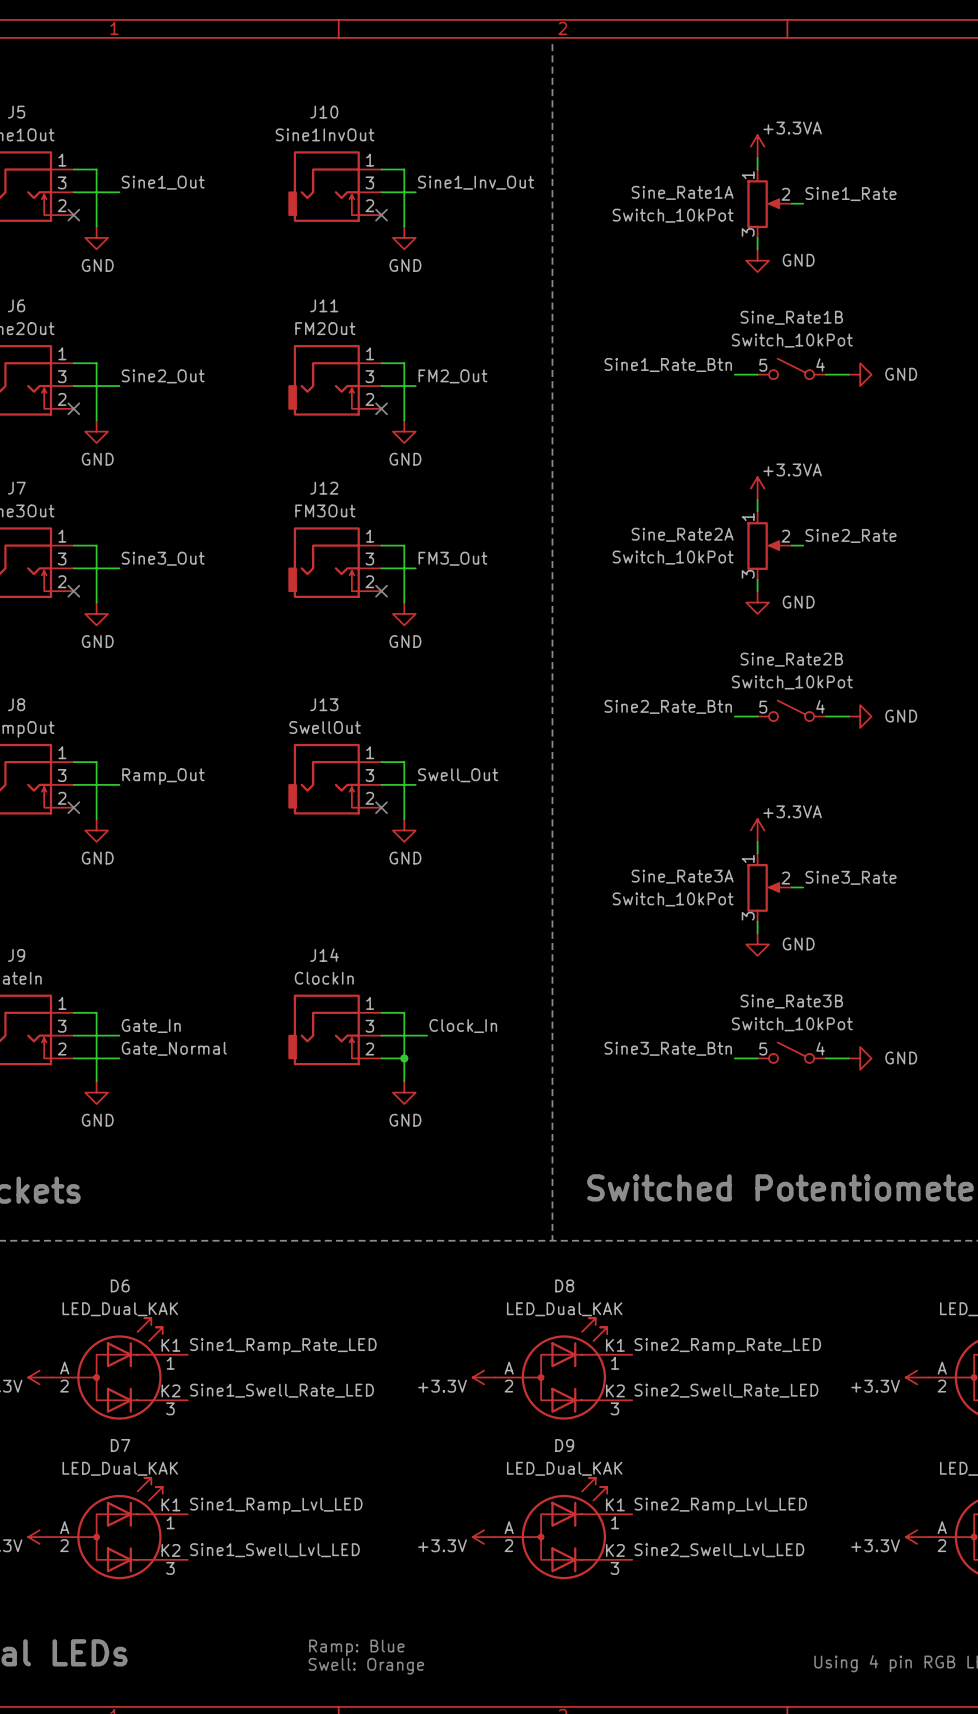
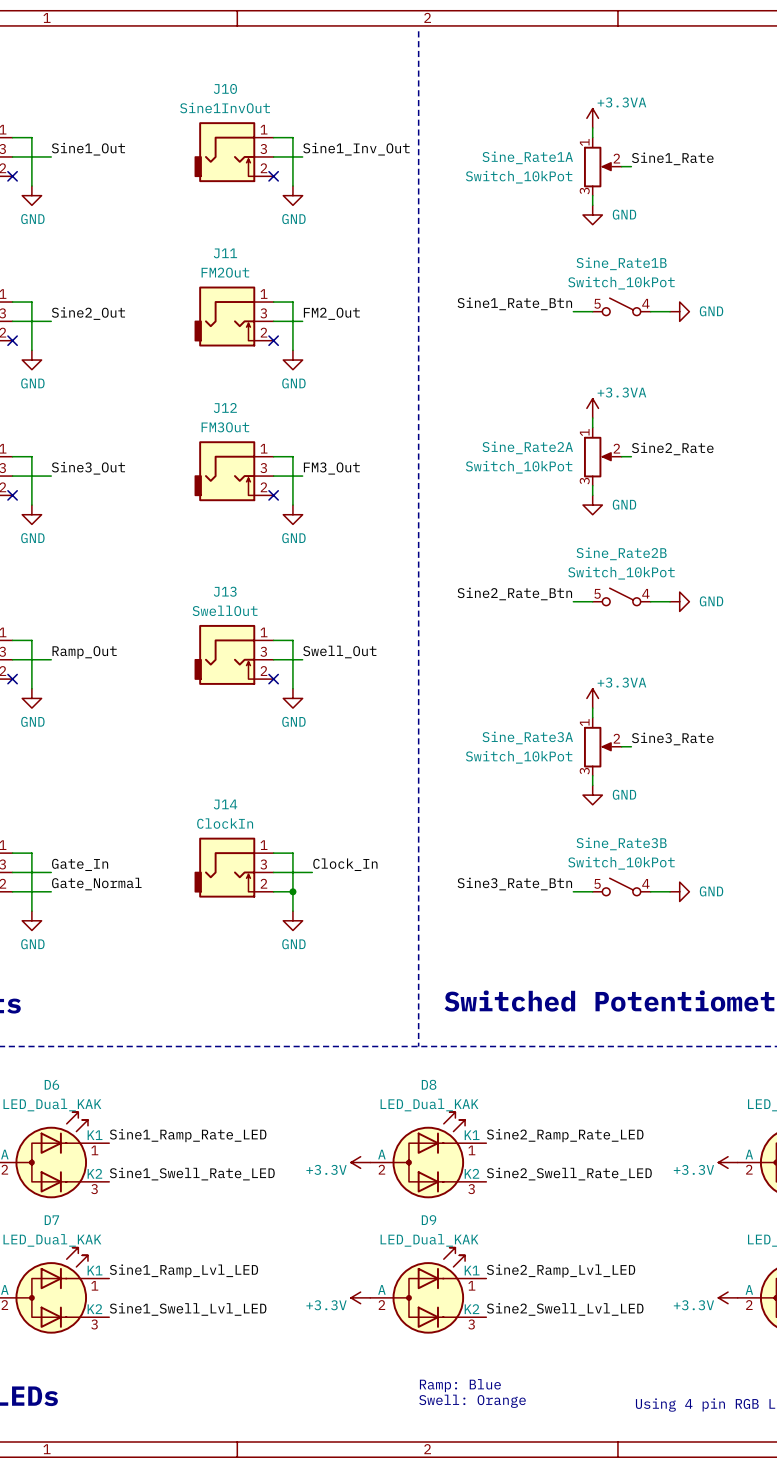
text: none -> Ramp: Blue (460, 1385)
text: Ramp: Blue (356, 1647) -> none
text: none -> Swell: Orange (472, 1401)
text: Swell: Orange (366, 1666) -> none

